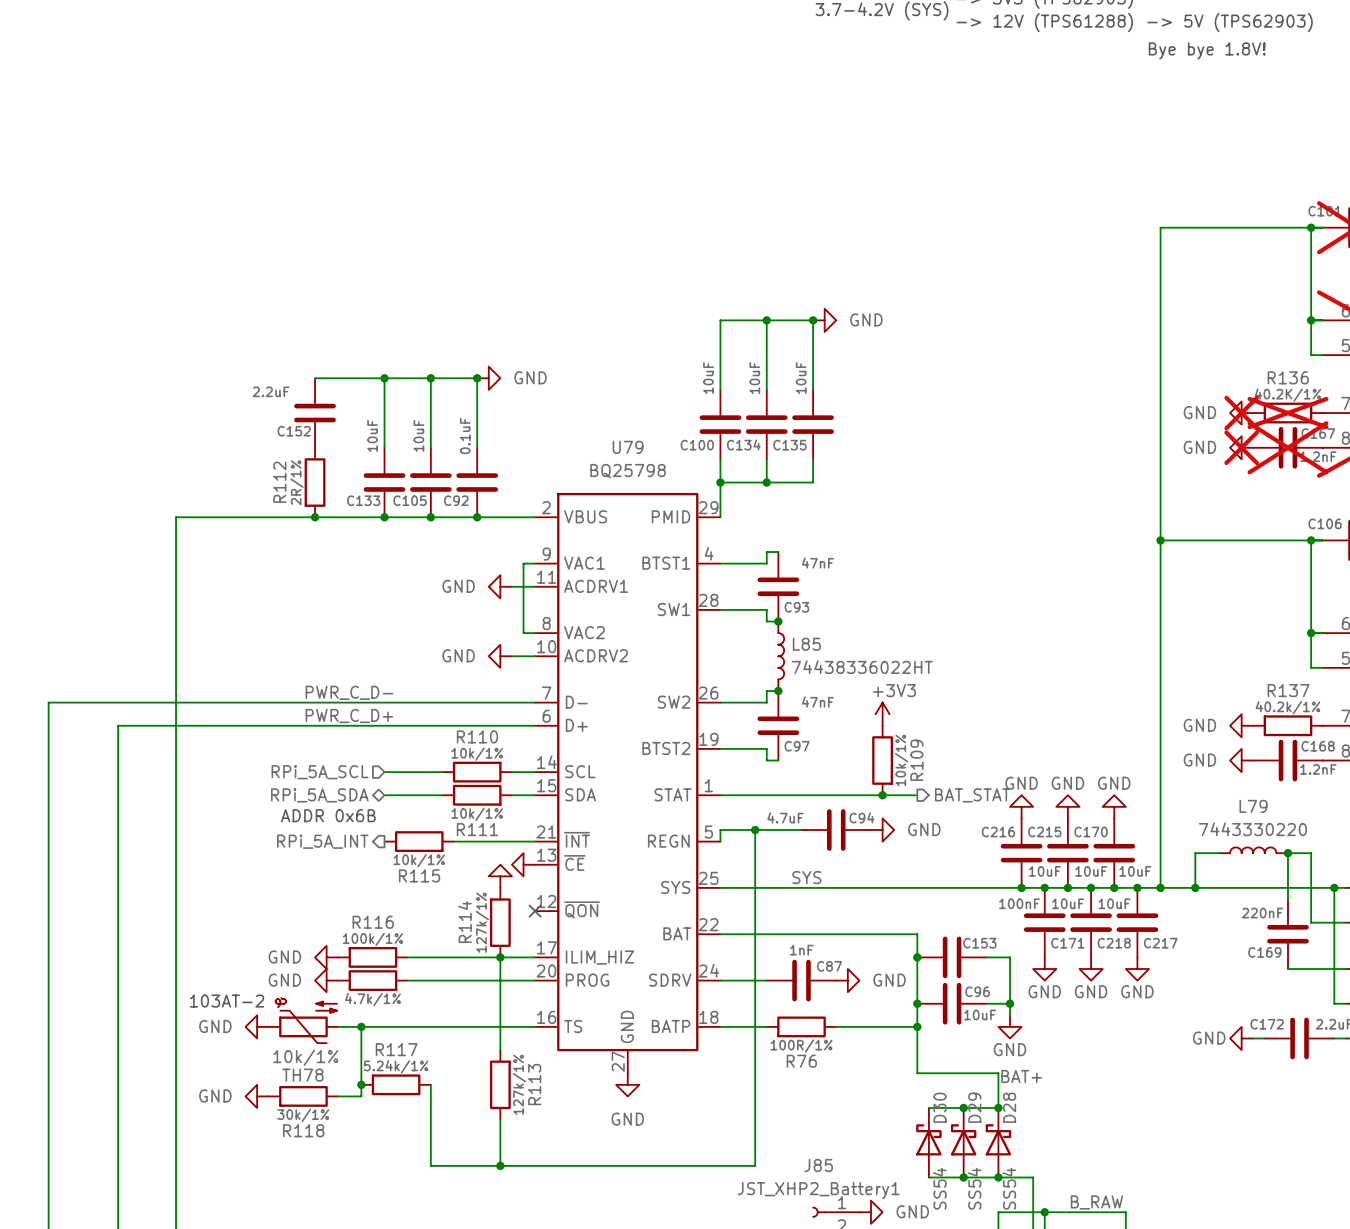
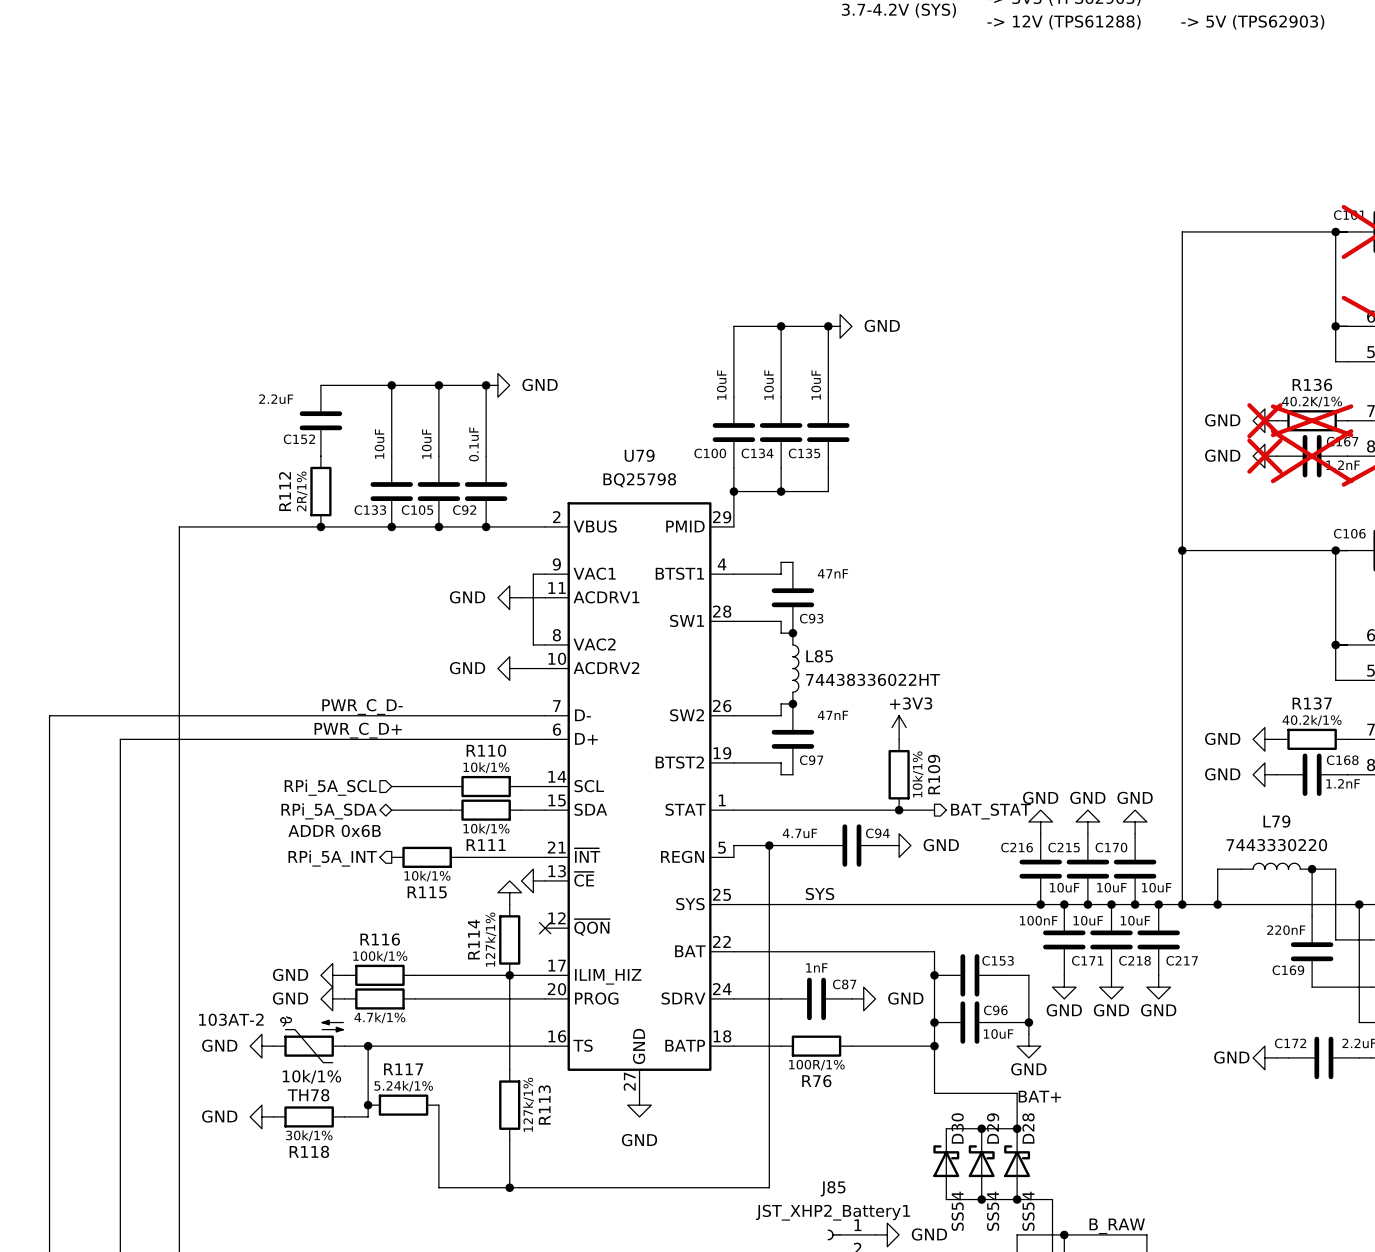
text: Bye bye 1.8V! (1207, 50) -> none

